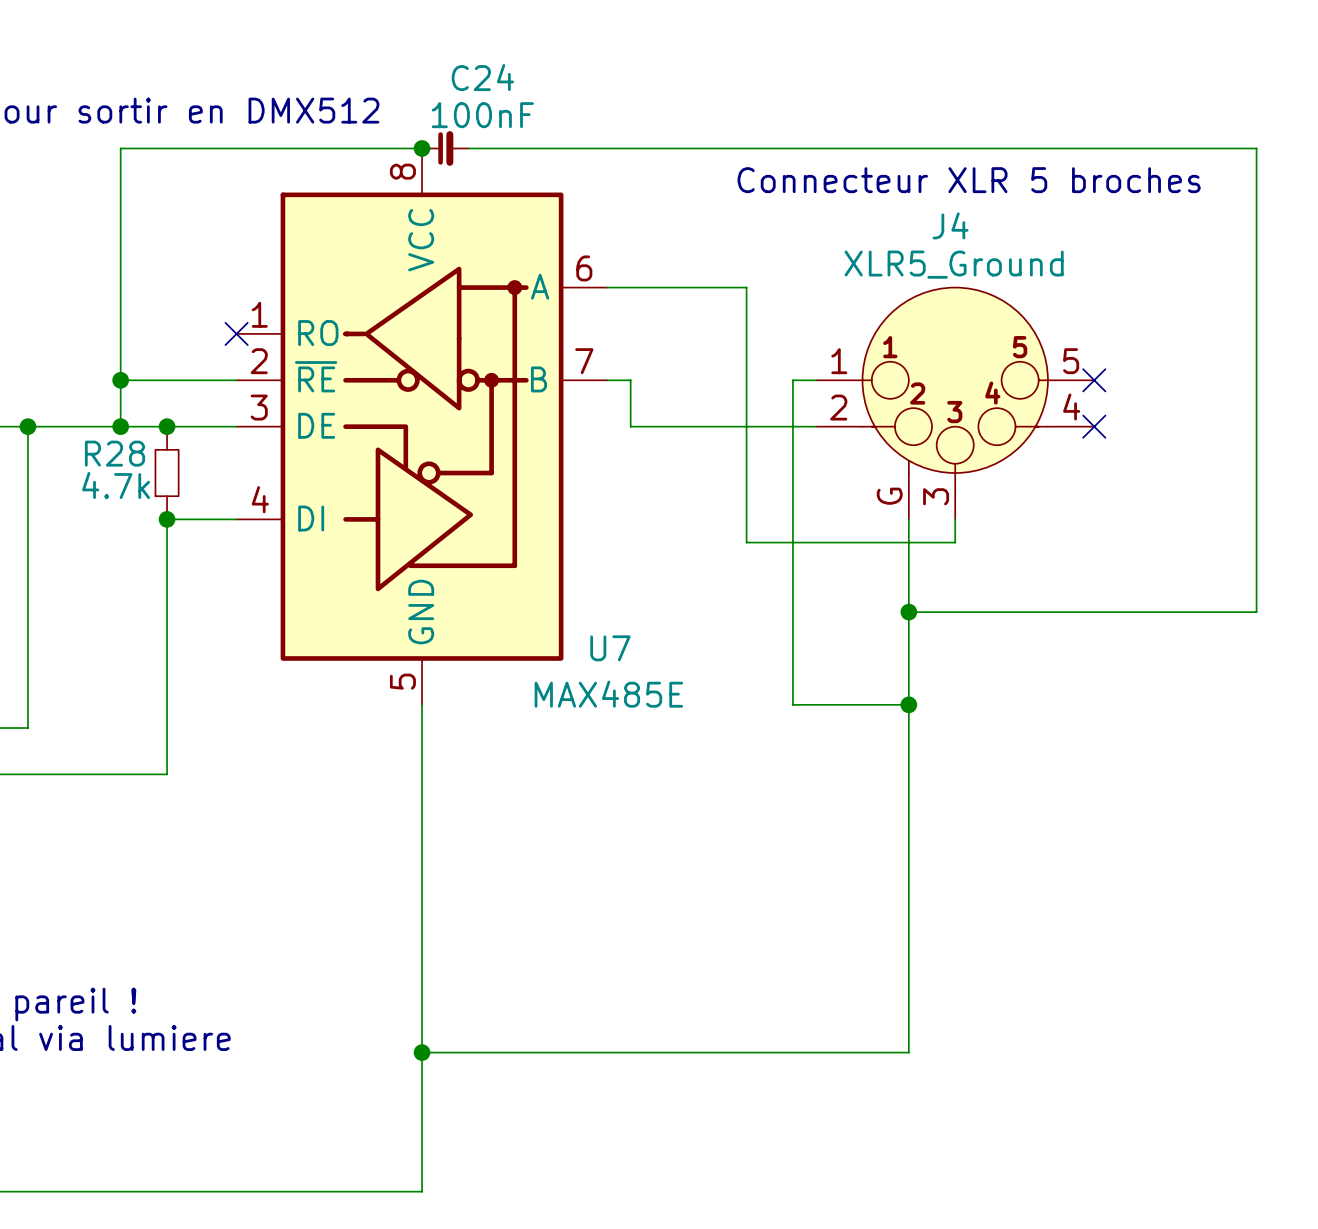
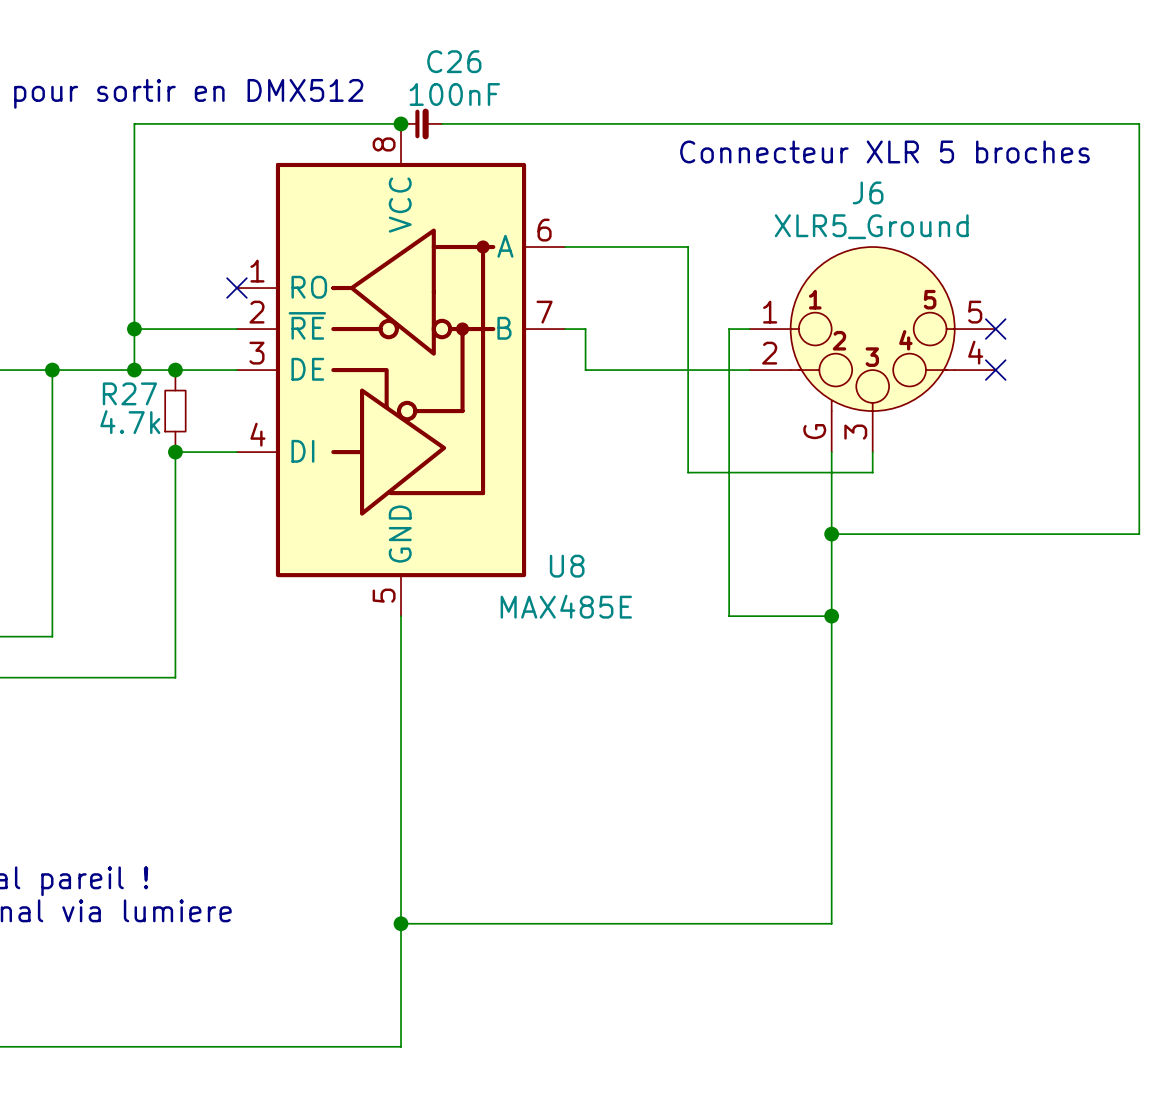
C24 name: C24 (482, 77) -> C26 (454, 61)
J4 name: J4 (950, 225) -> J6 (868, 192)
R28 name: R28 (115, 453) -> R27 (129, 393)
U7 name: U7 (610, 648) -> U8 (567, 566)

